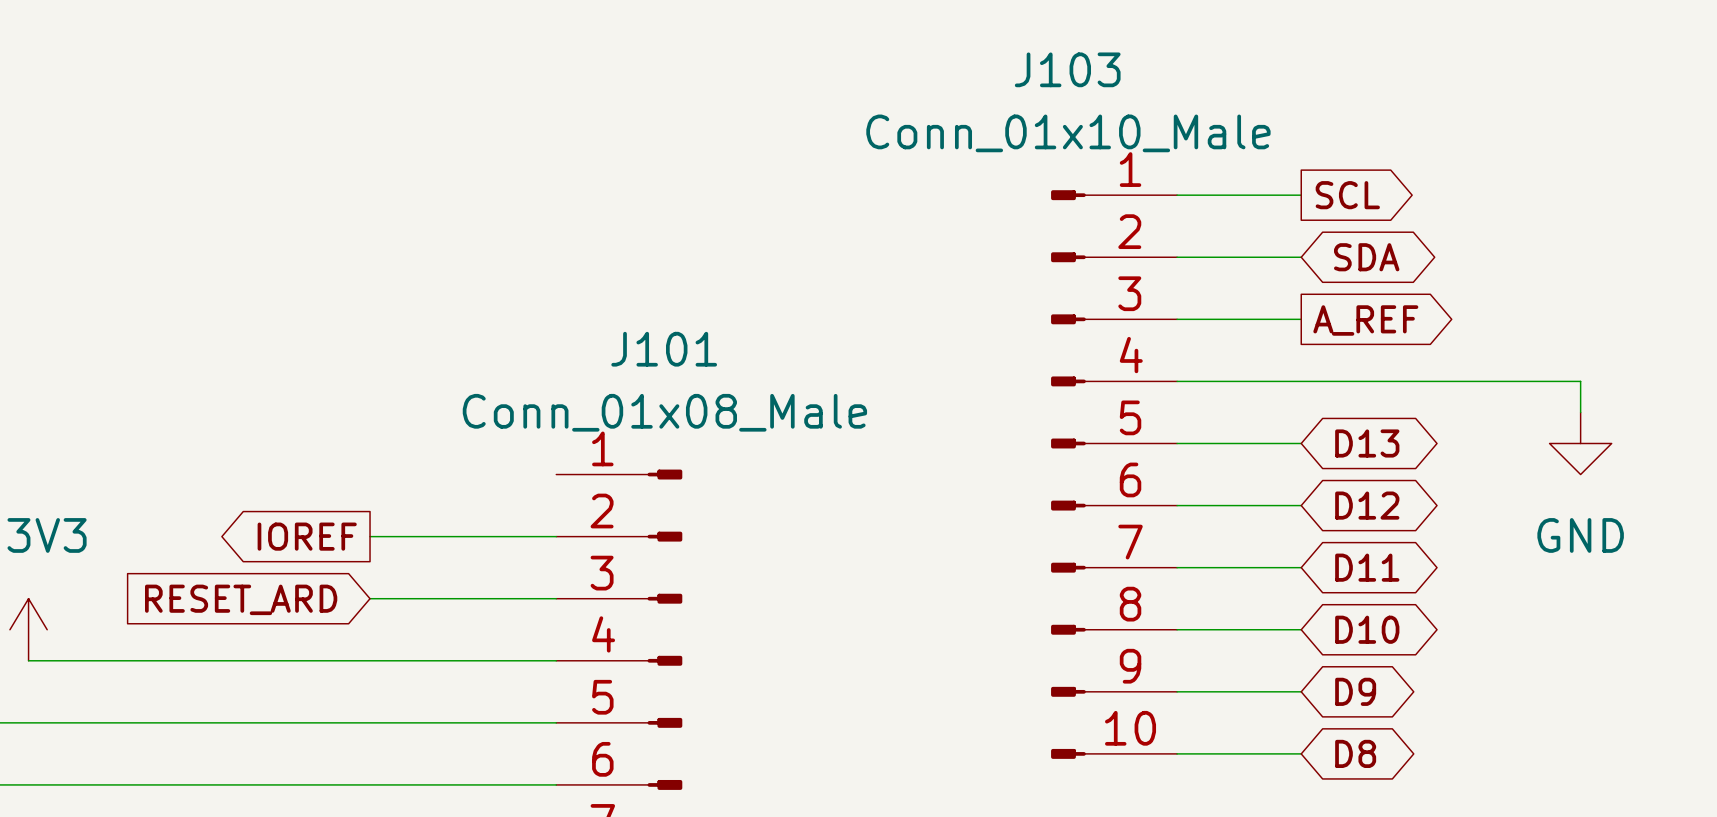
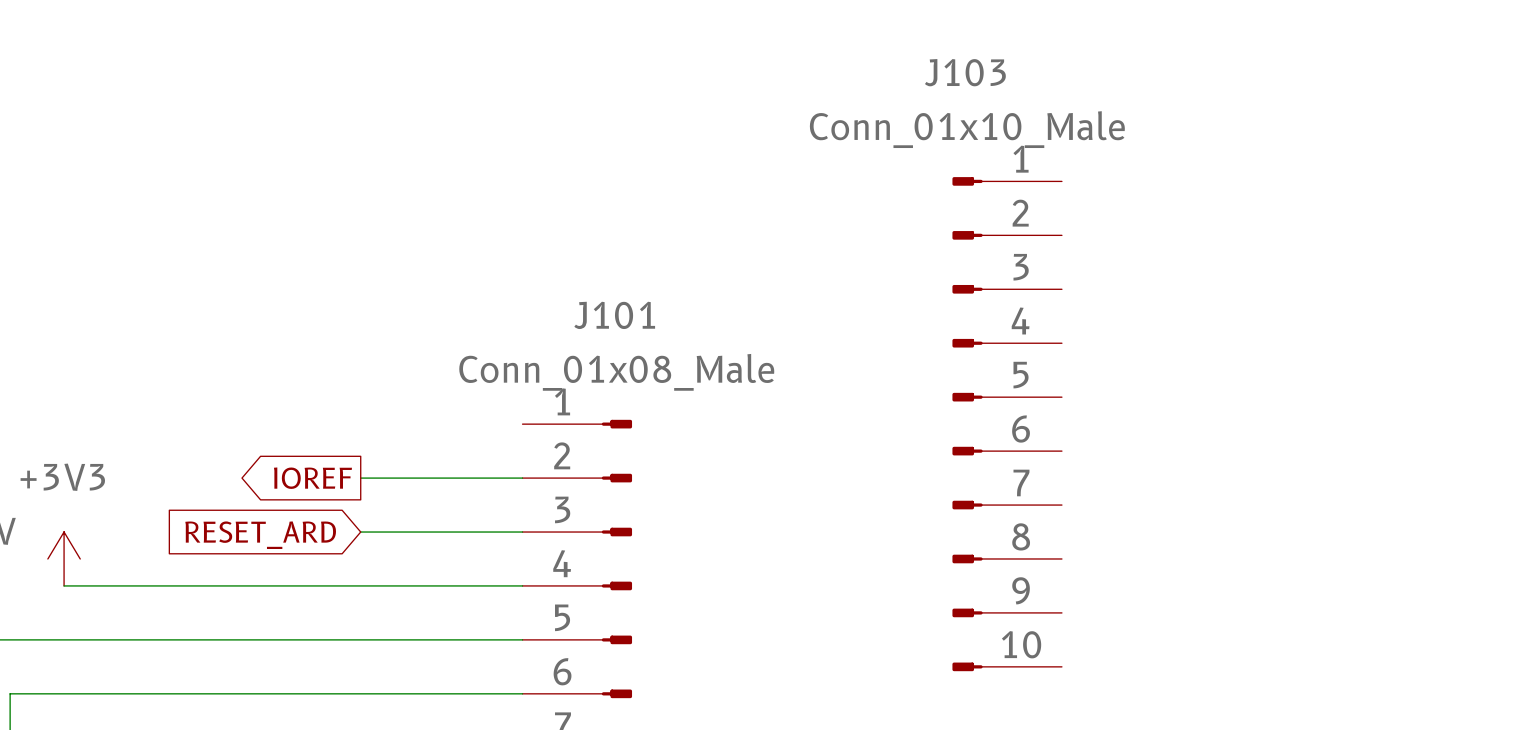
wire: (1177, 195) (1301, 195) -> none
global label: SCL (1347, 195) -> none
wire: (1177, 257) (1301, 257) -> none
global label: SDA (1366, 257) -> none
wire: (1177, 319) (1301, 319) -> none
global label: A_REF (1365, 320) -> none
wire: (1177, 381) (1580, 381) (1580, 412) -> none
wire: (1177, 443) (1301, 443) -> none
global label: D13 (1367, 443) -> none
power symbol: GND (1580, 443) -> none
wire: (1177, 505) (1301, 505) -> none
global label: D12 (1367, 505) -> none
wire: (1177, 567) (1301, 567) -> none
global label: D11 (1367, 567) -> none
wire: (1177, 629) (1301, 629) -> none
global label: D10 (1367, 629) -> none
wire: (1177, 691) (1301, 691) -> none
global label: D9 (1355, 691) -> none
wire: (1177, 753) (1301, 753) -> none
global label: D8 (1355, 753) -> none

